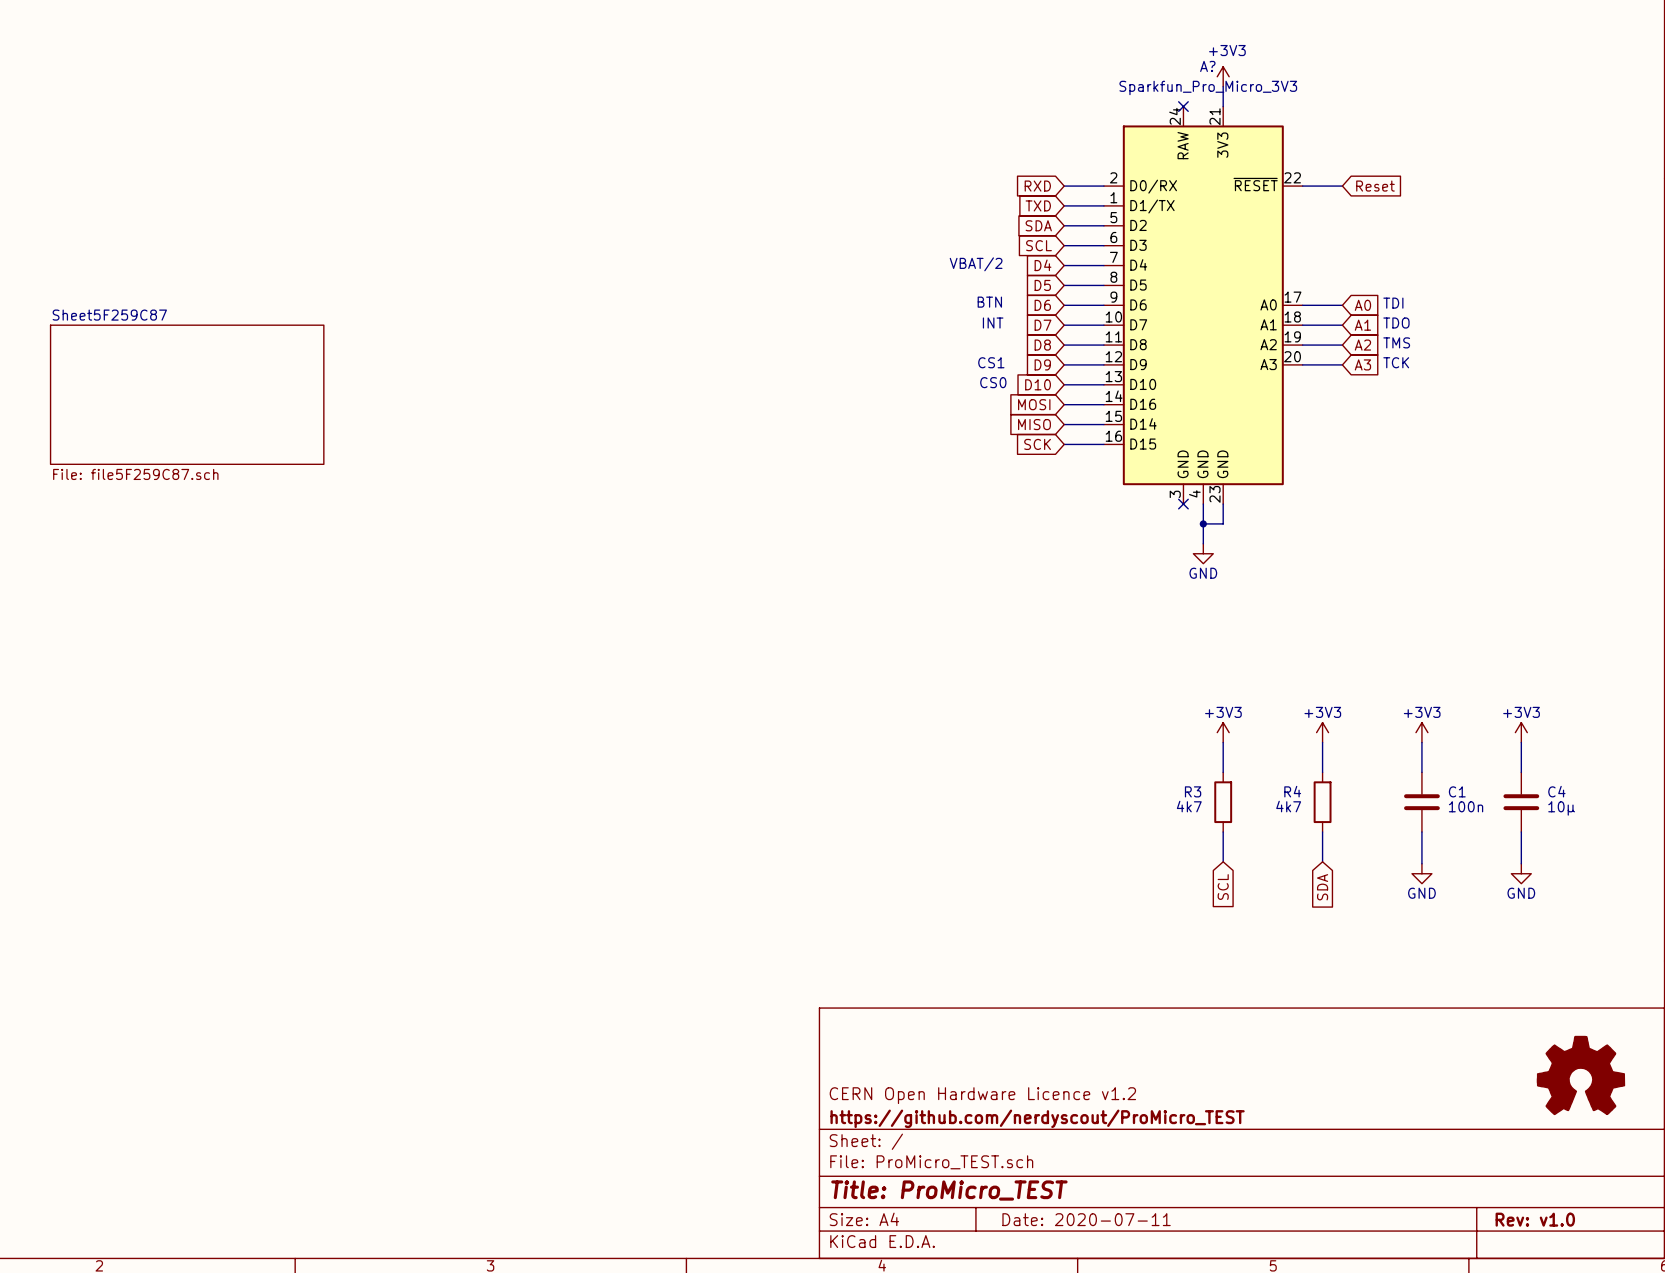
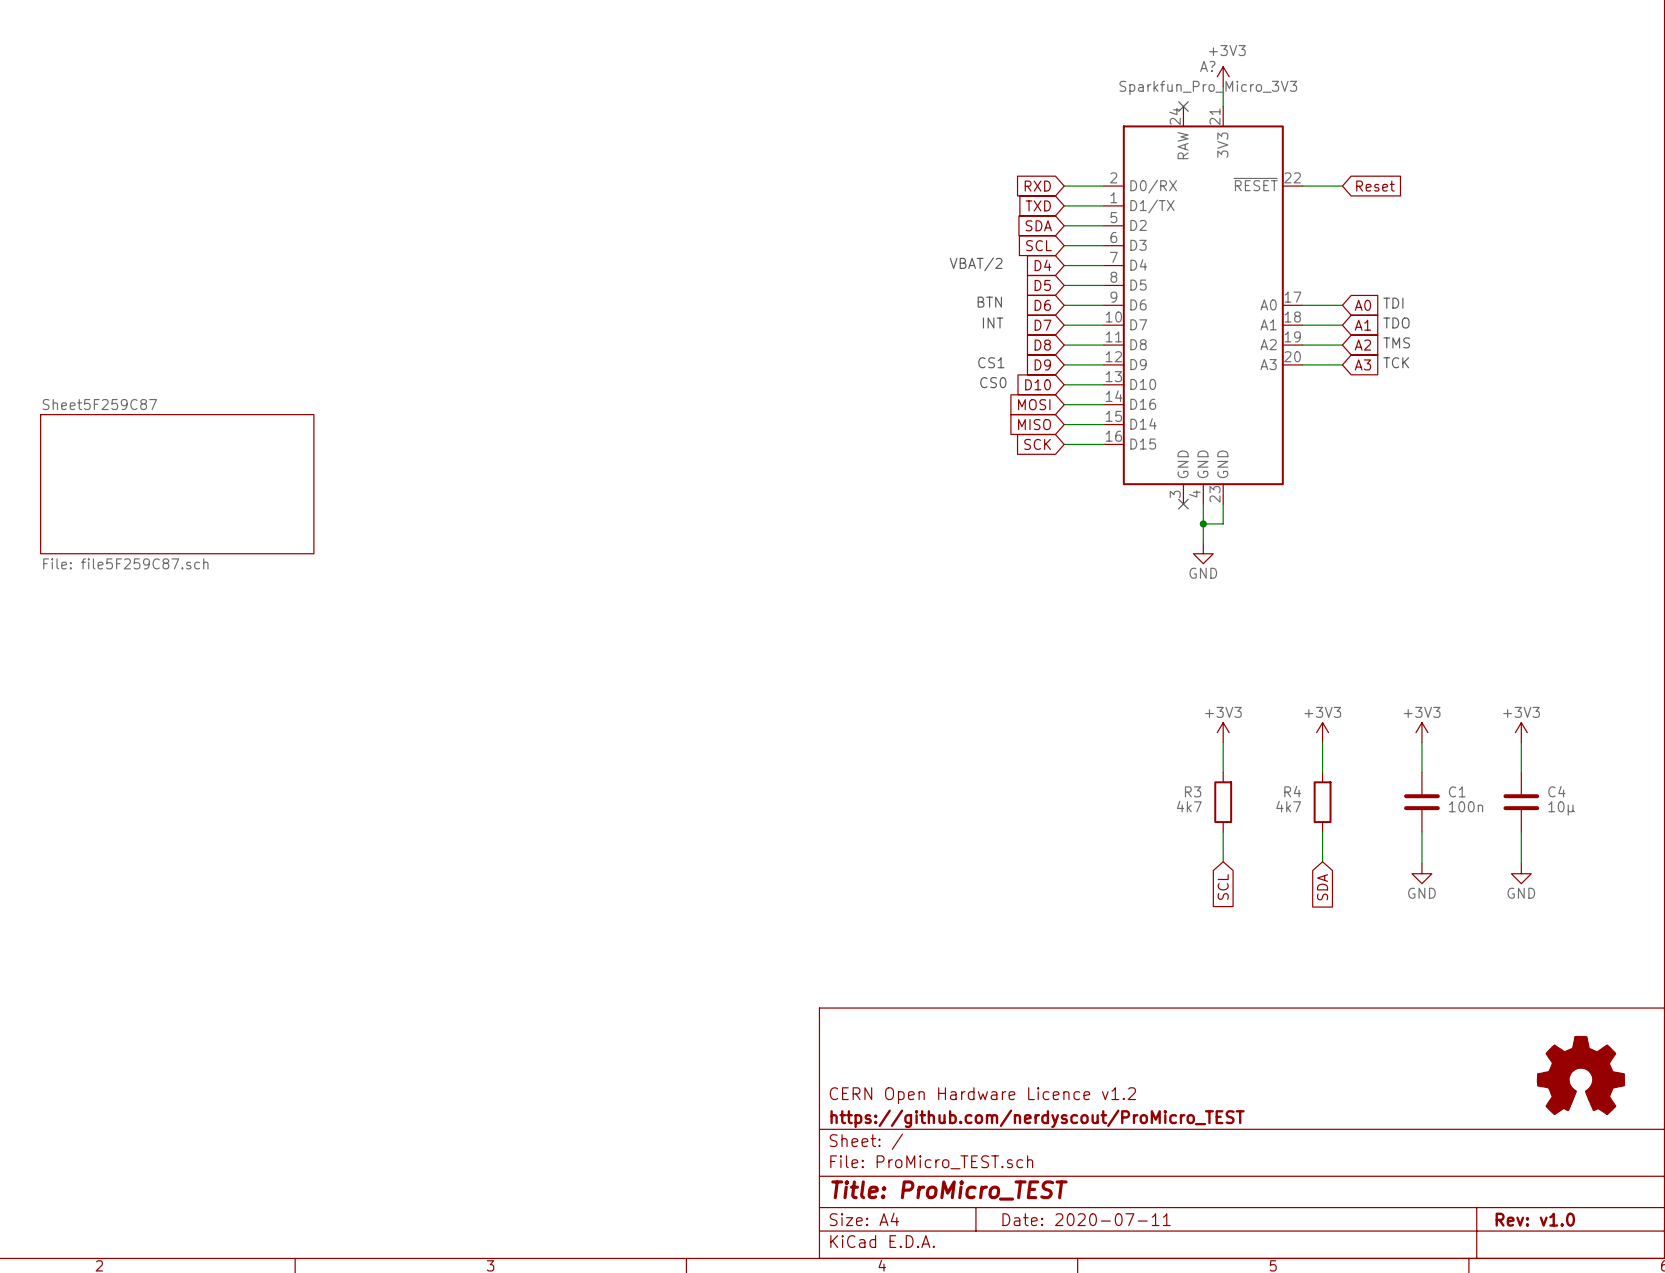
sheet Sheet5F259C87 position: (187, 394) -> (177, 484)

